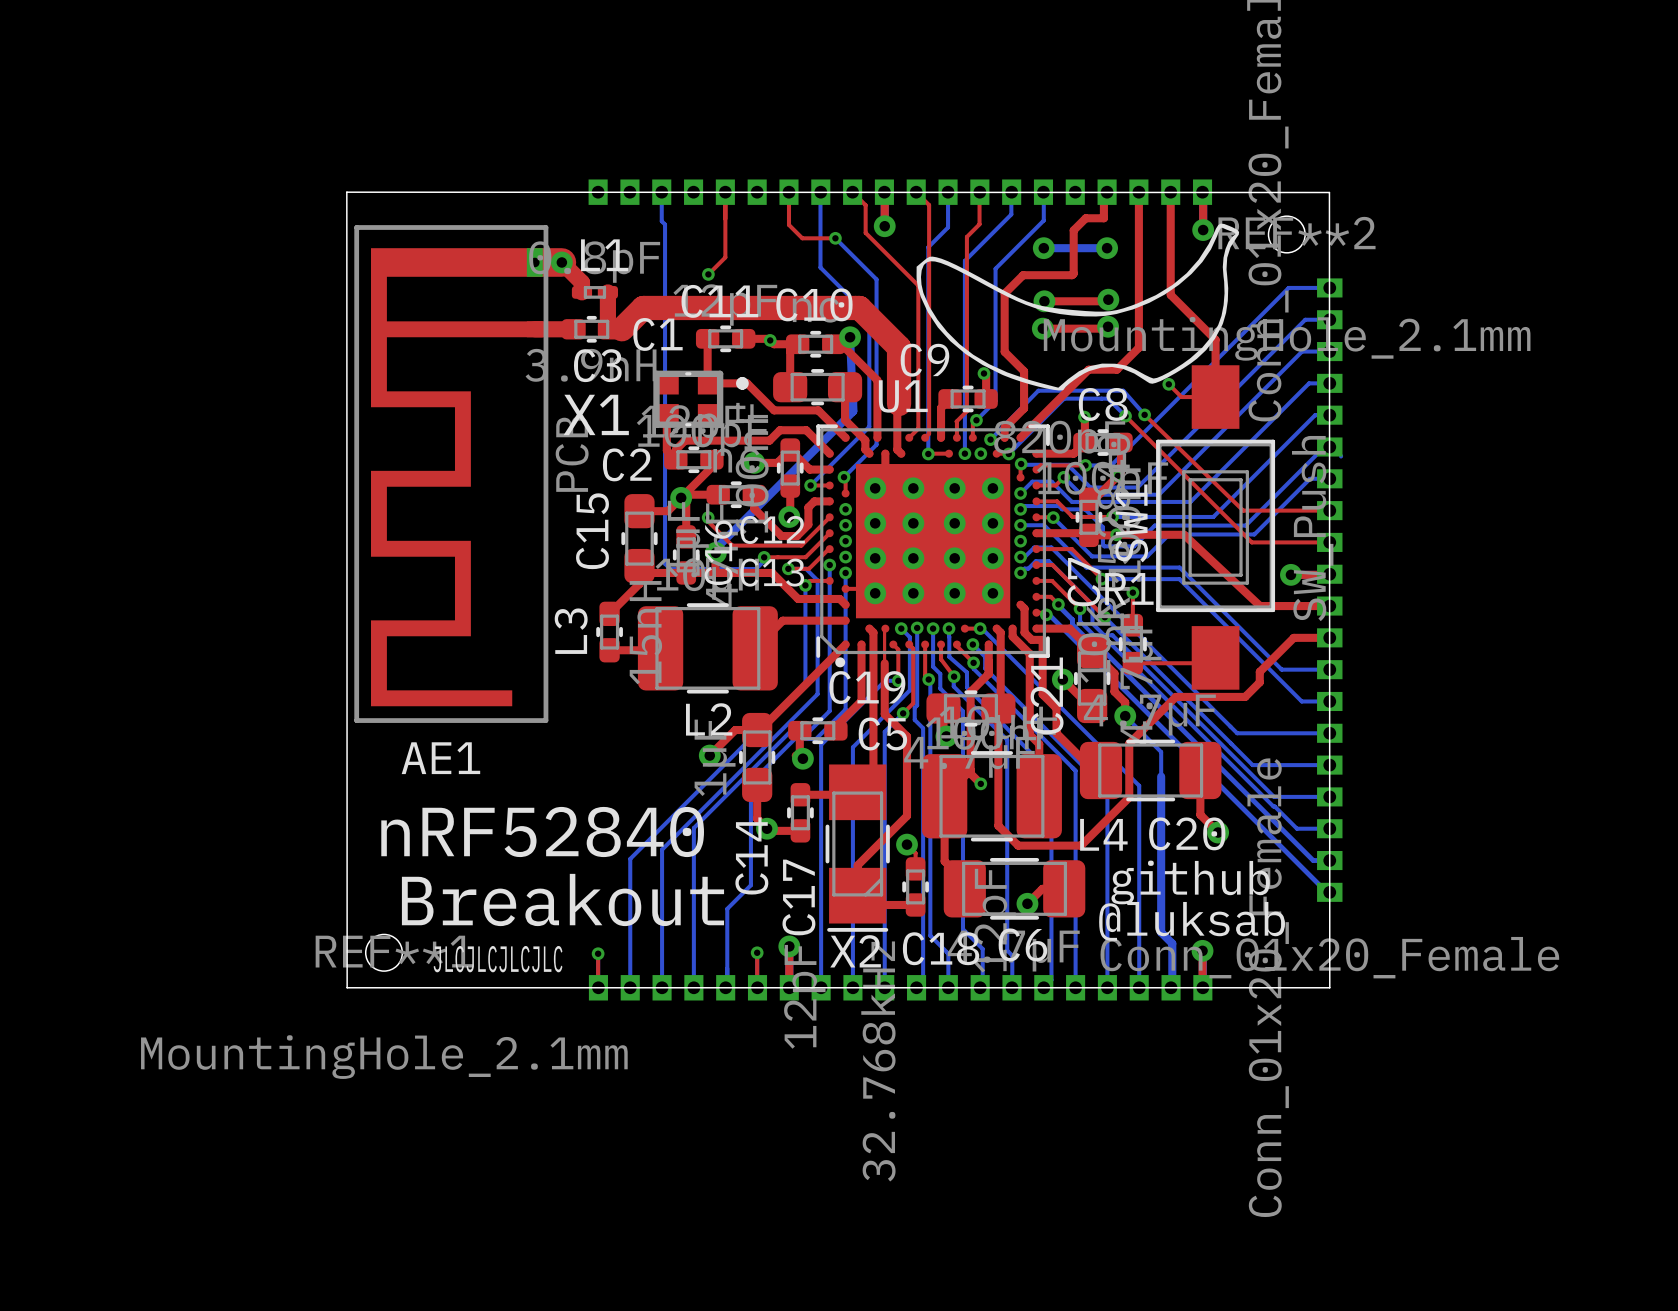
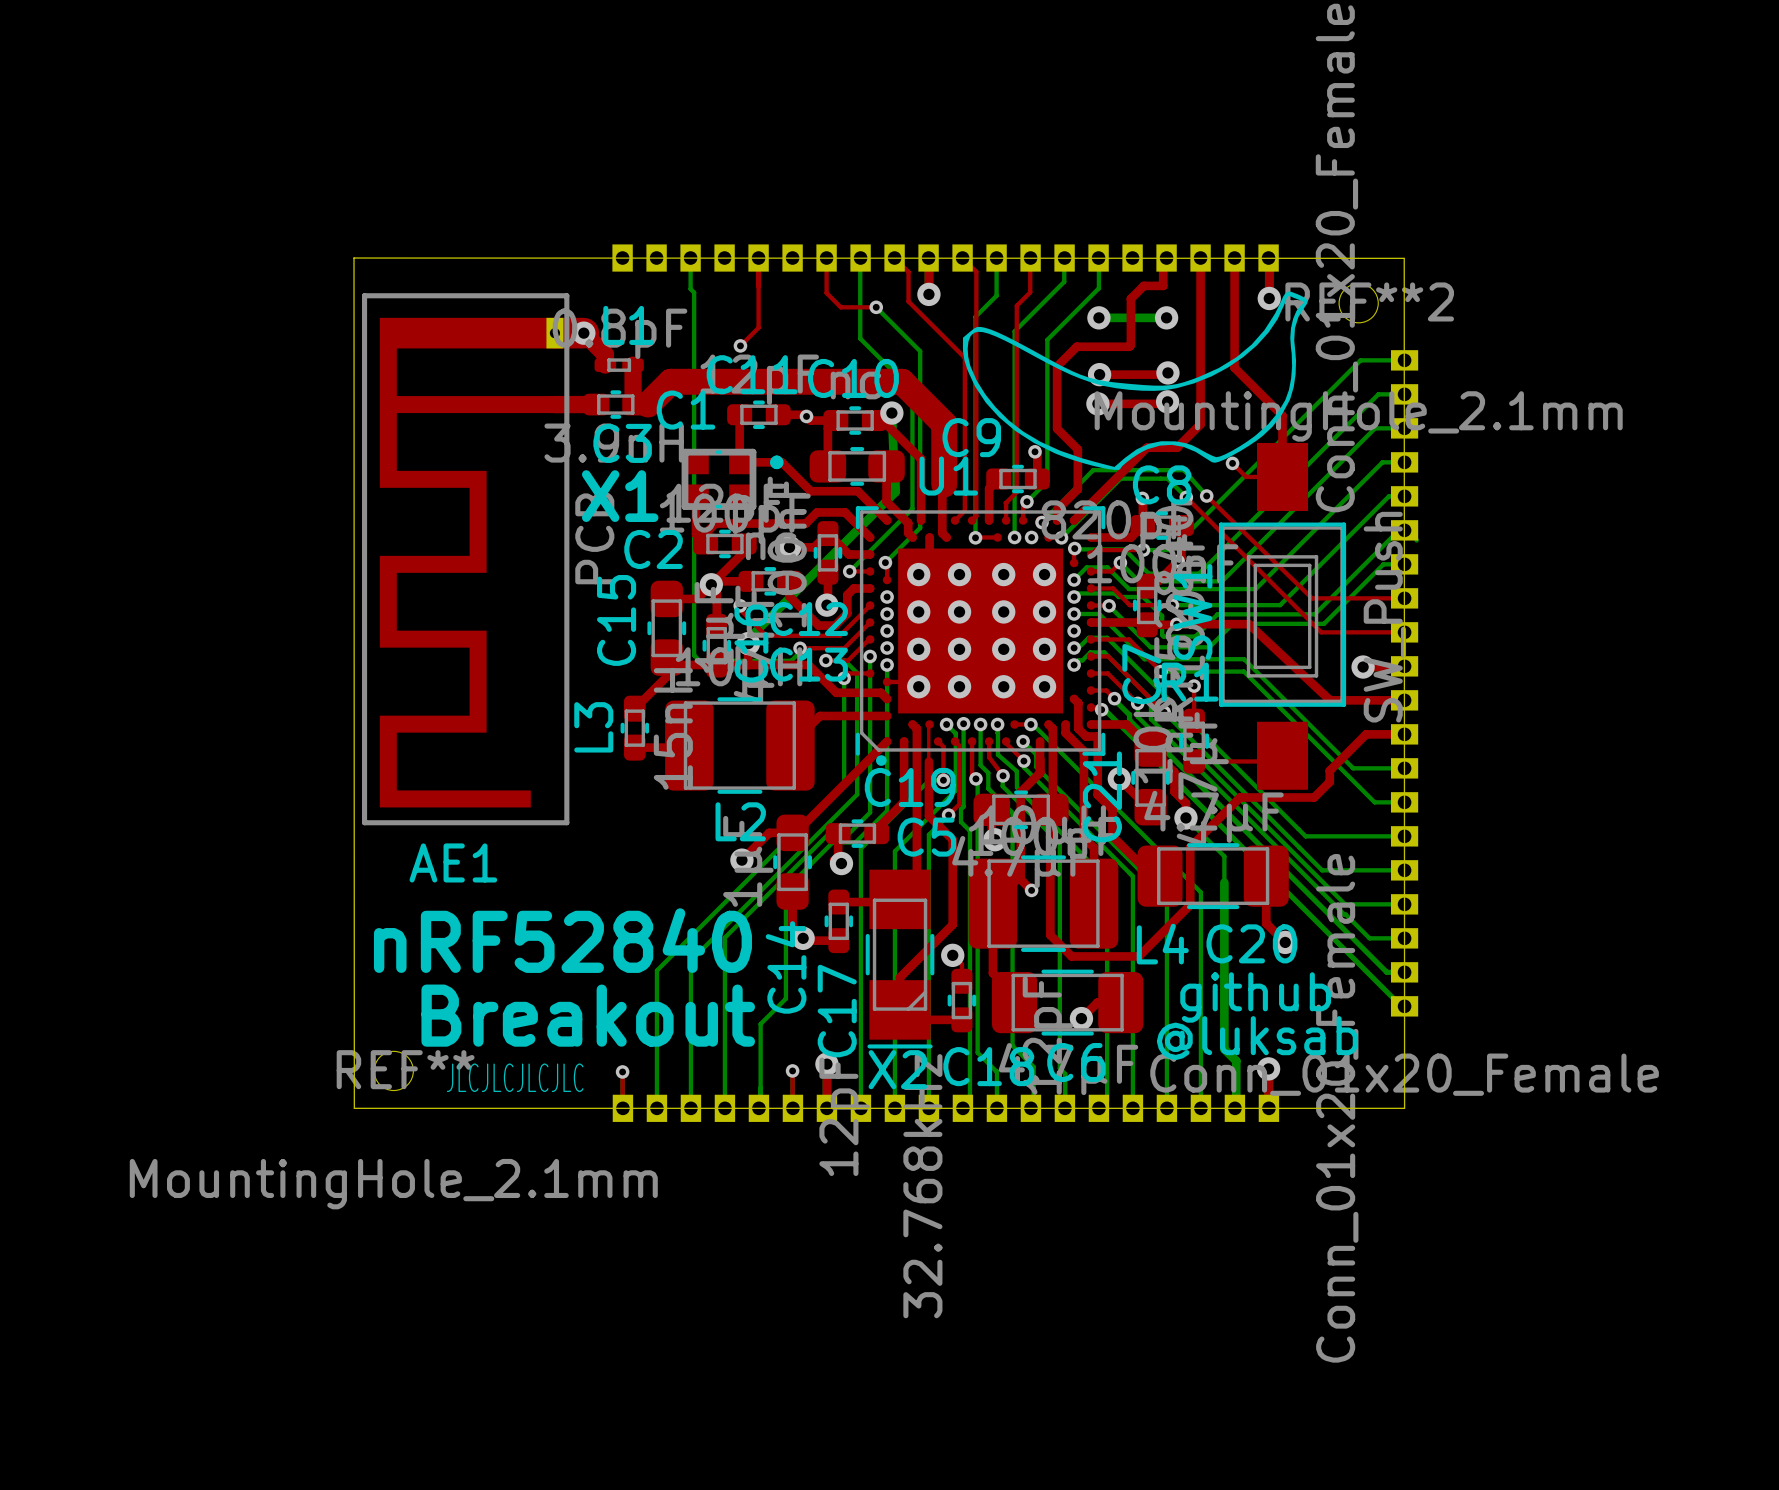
REF**1 name: REF**1 (394, 951) -> REF** (405, 1069)

